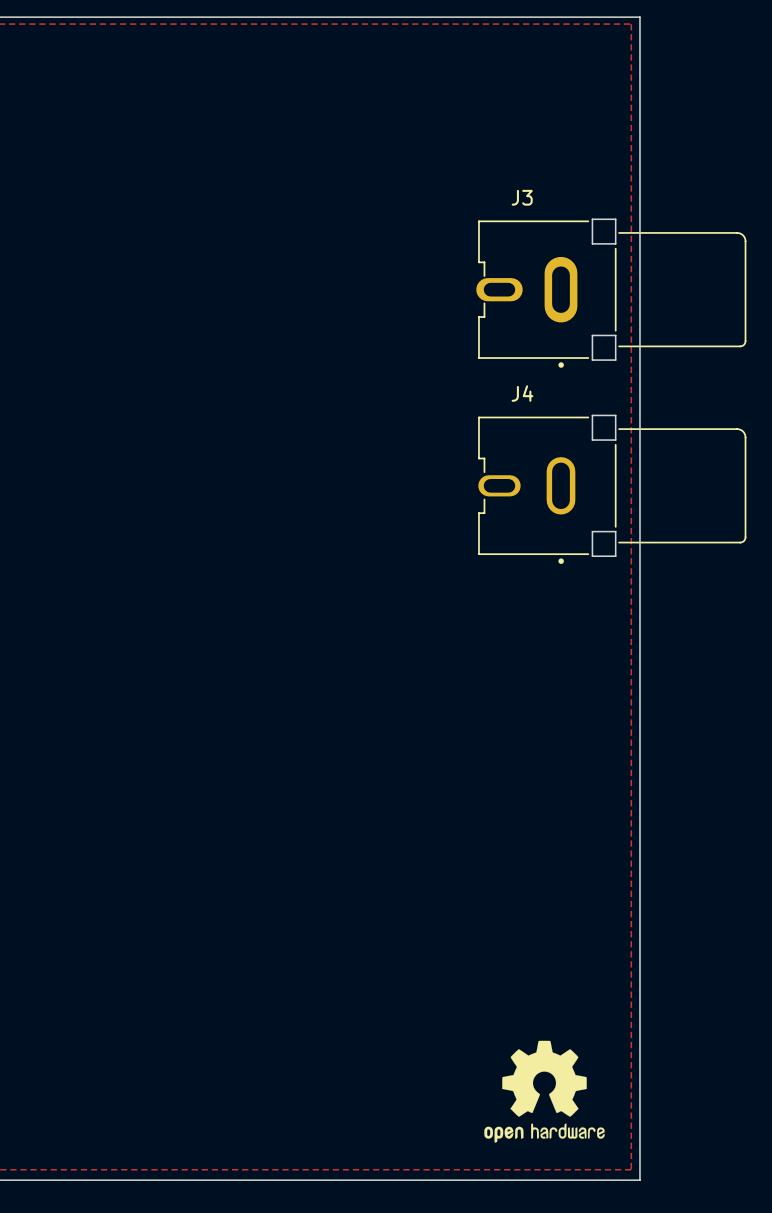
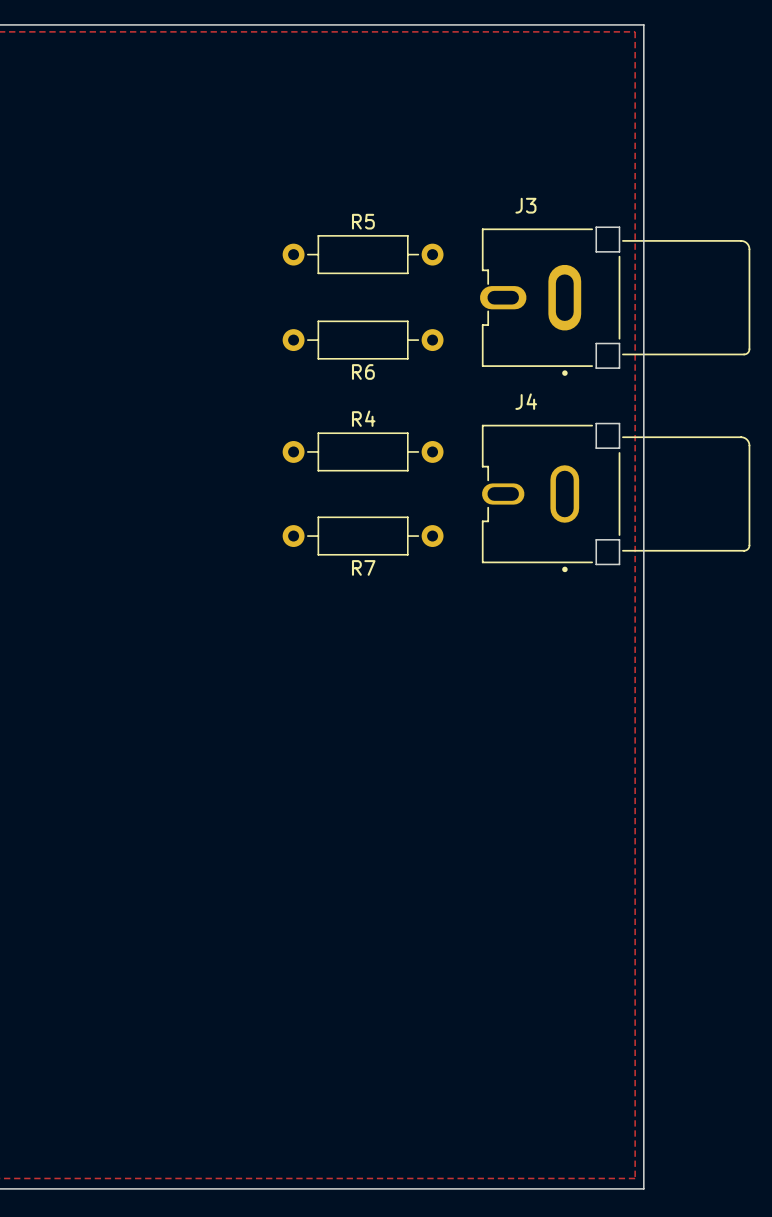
R5: none -> (363, 254)
R6: none -> (363, 340)
R4: none -> (363, 451)
R7: none -> (363, 536)
drawing: [484, 1040, 605, 1143] -> none

